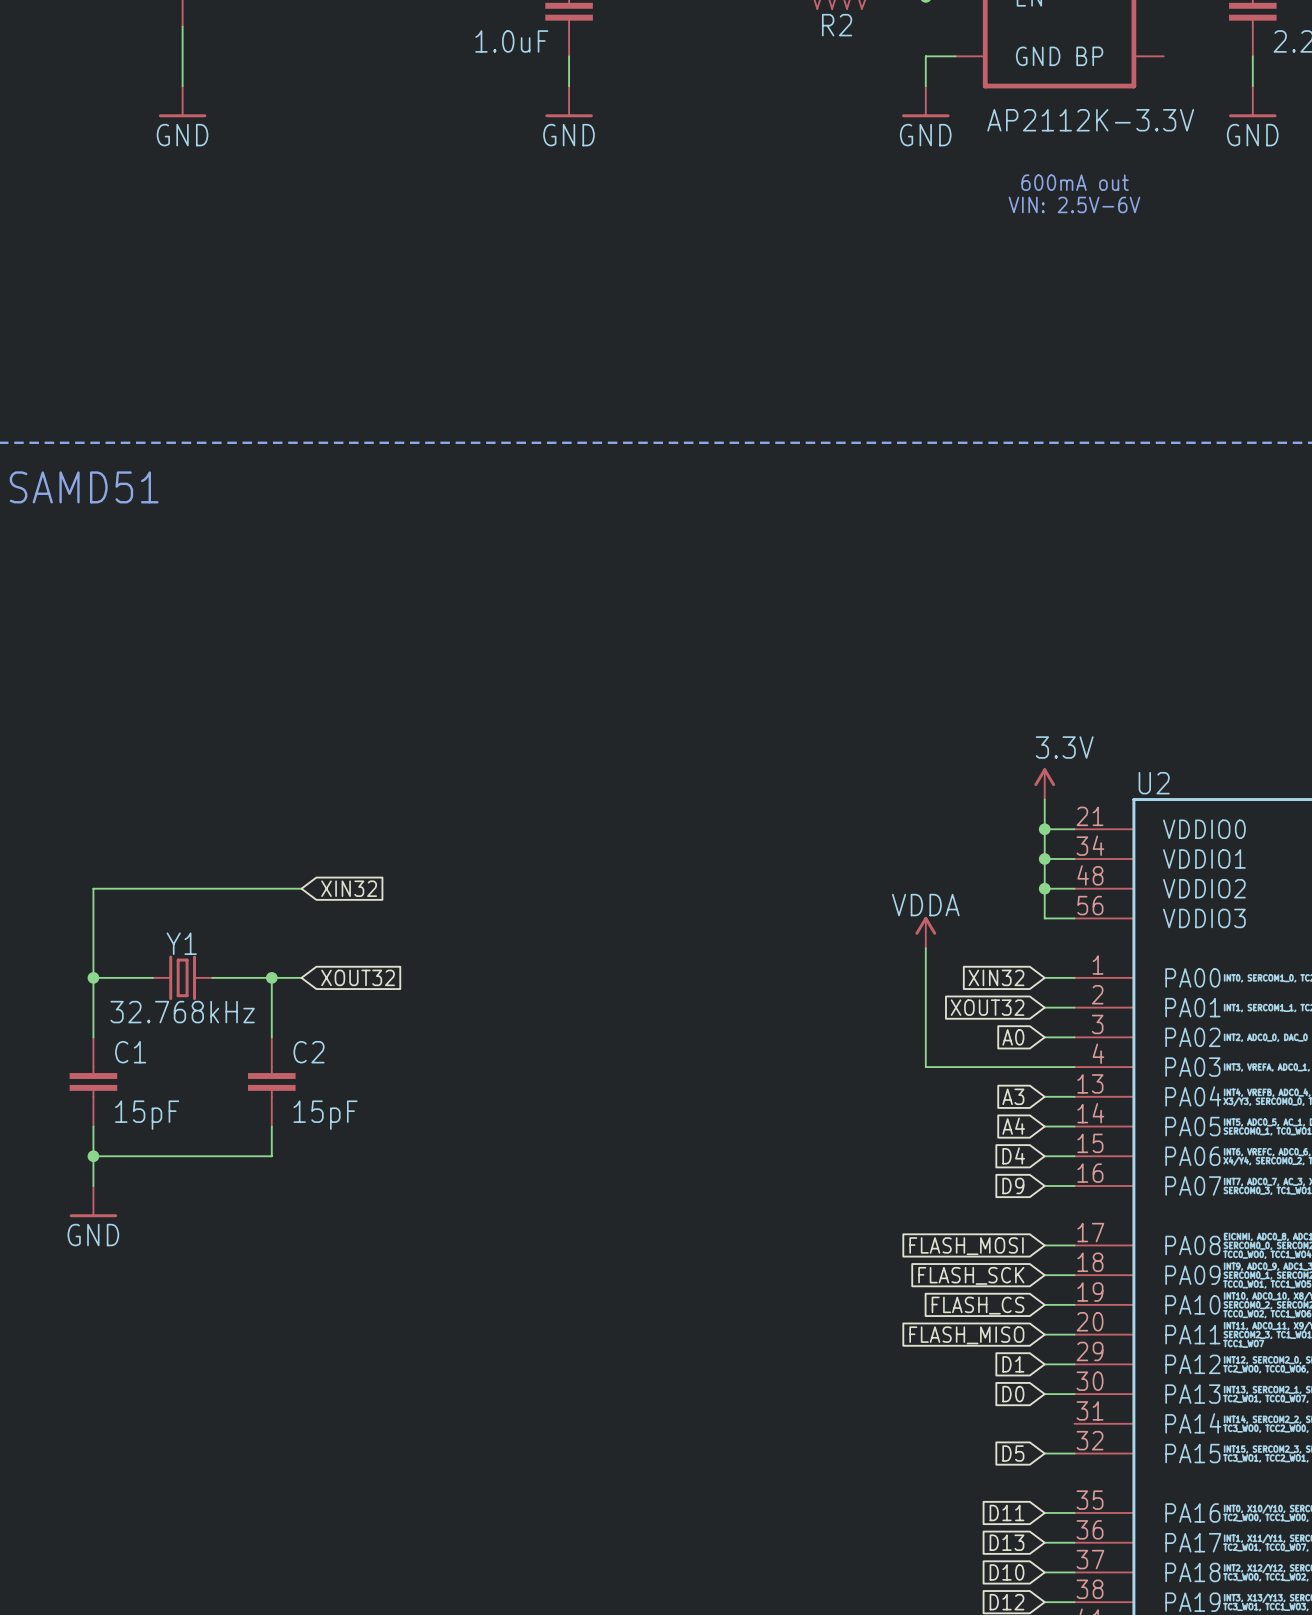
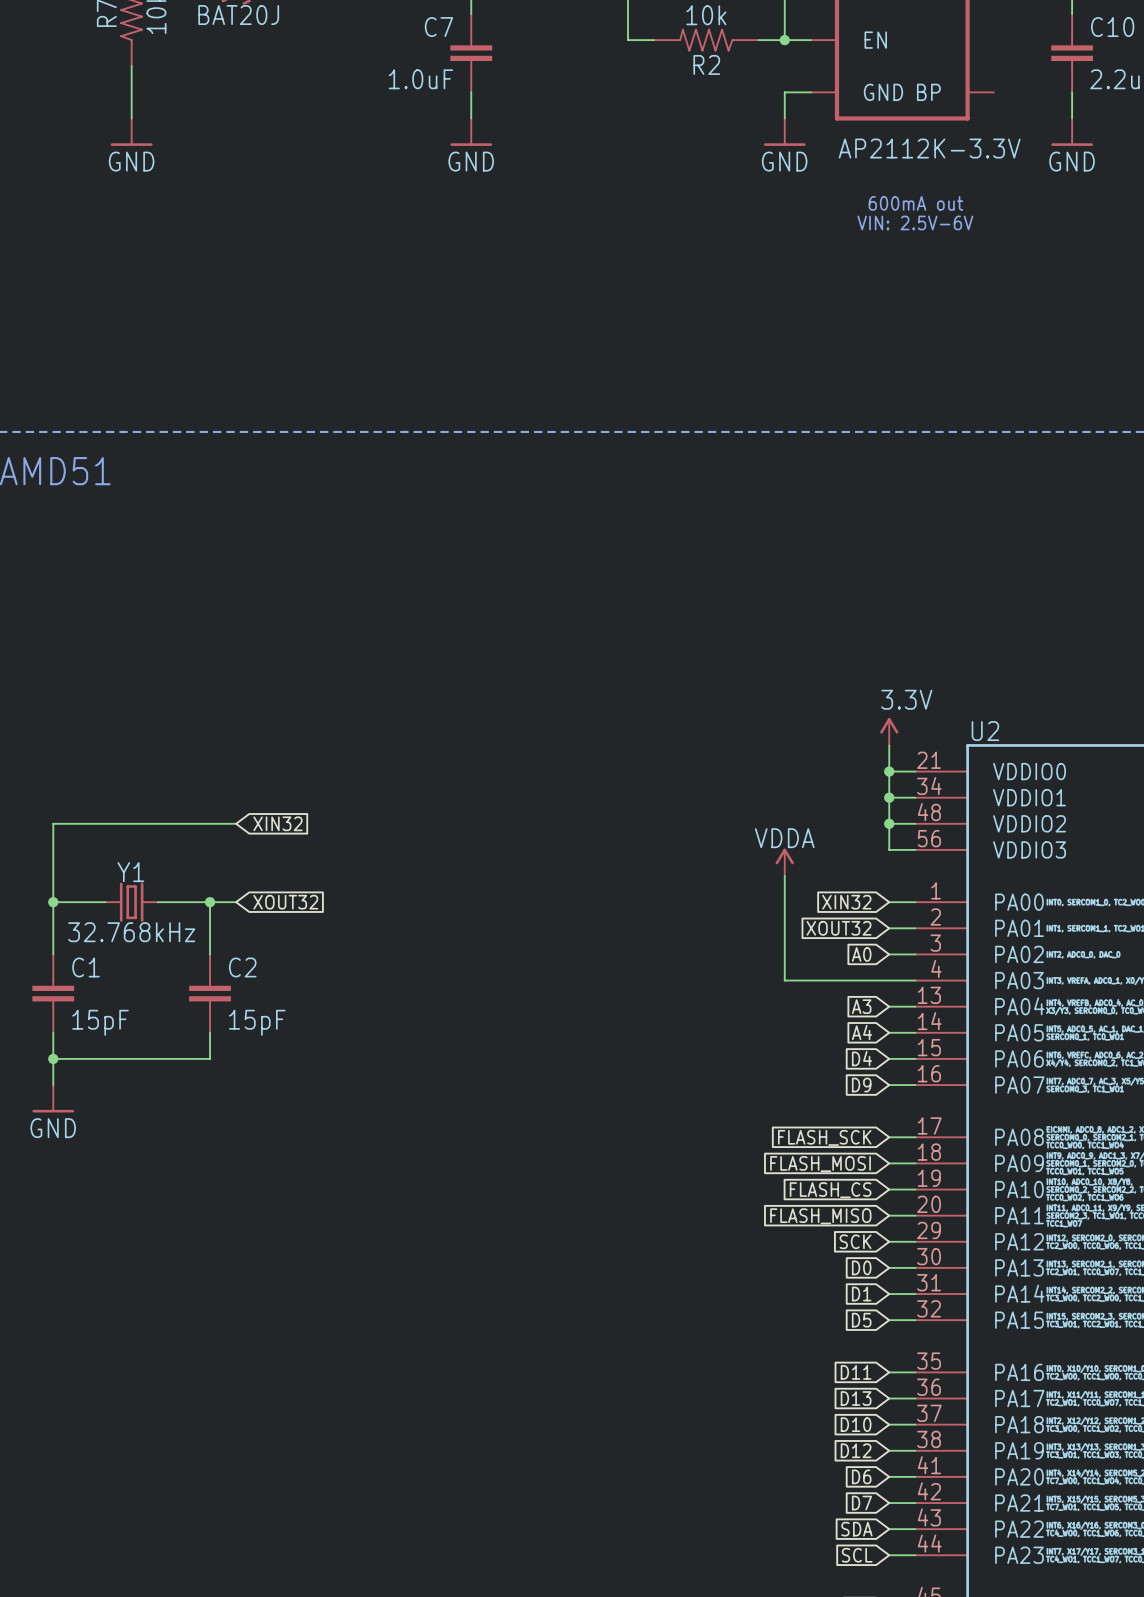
global label: FLASH_MOSI (966, 1246) -> FLASH_SCK (824, 1137)
global label: FLASH_SCK (971, 1275) -> FLASH_MOSI (820, 1164)
global label: D1 (1013, 1364) -> SCK (855, 1241)
global label: none -> D1 (861, 1294)
wire: none -> (889, 1294) (915, 1294)

